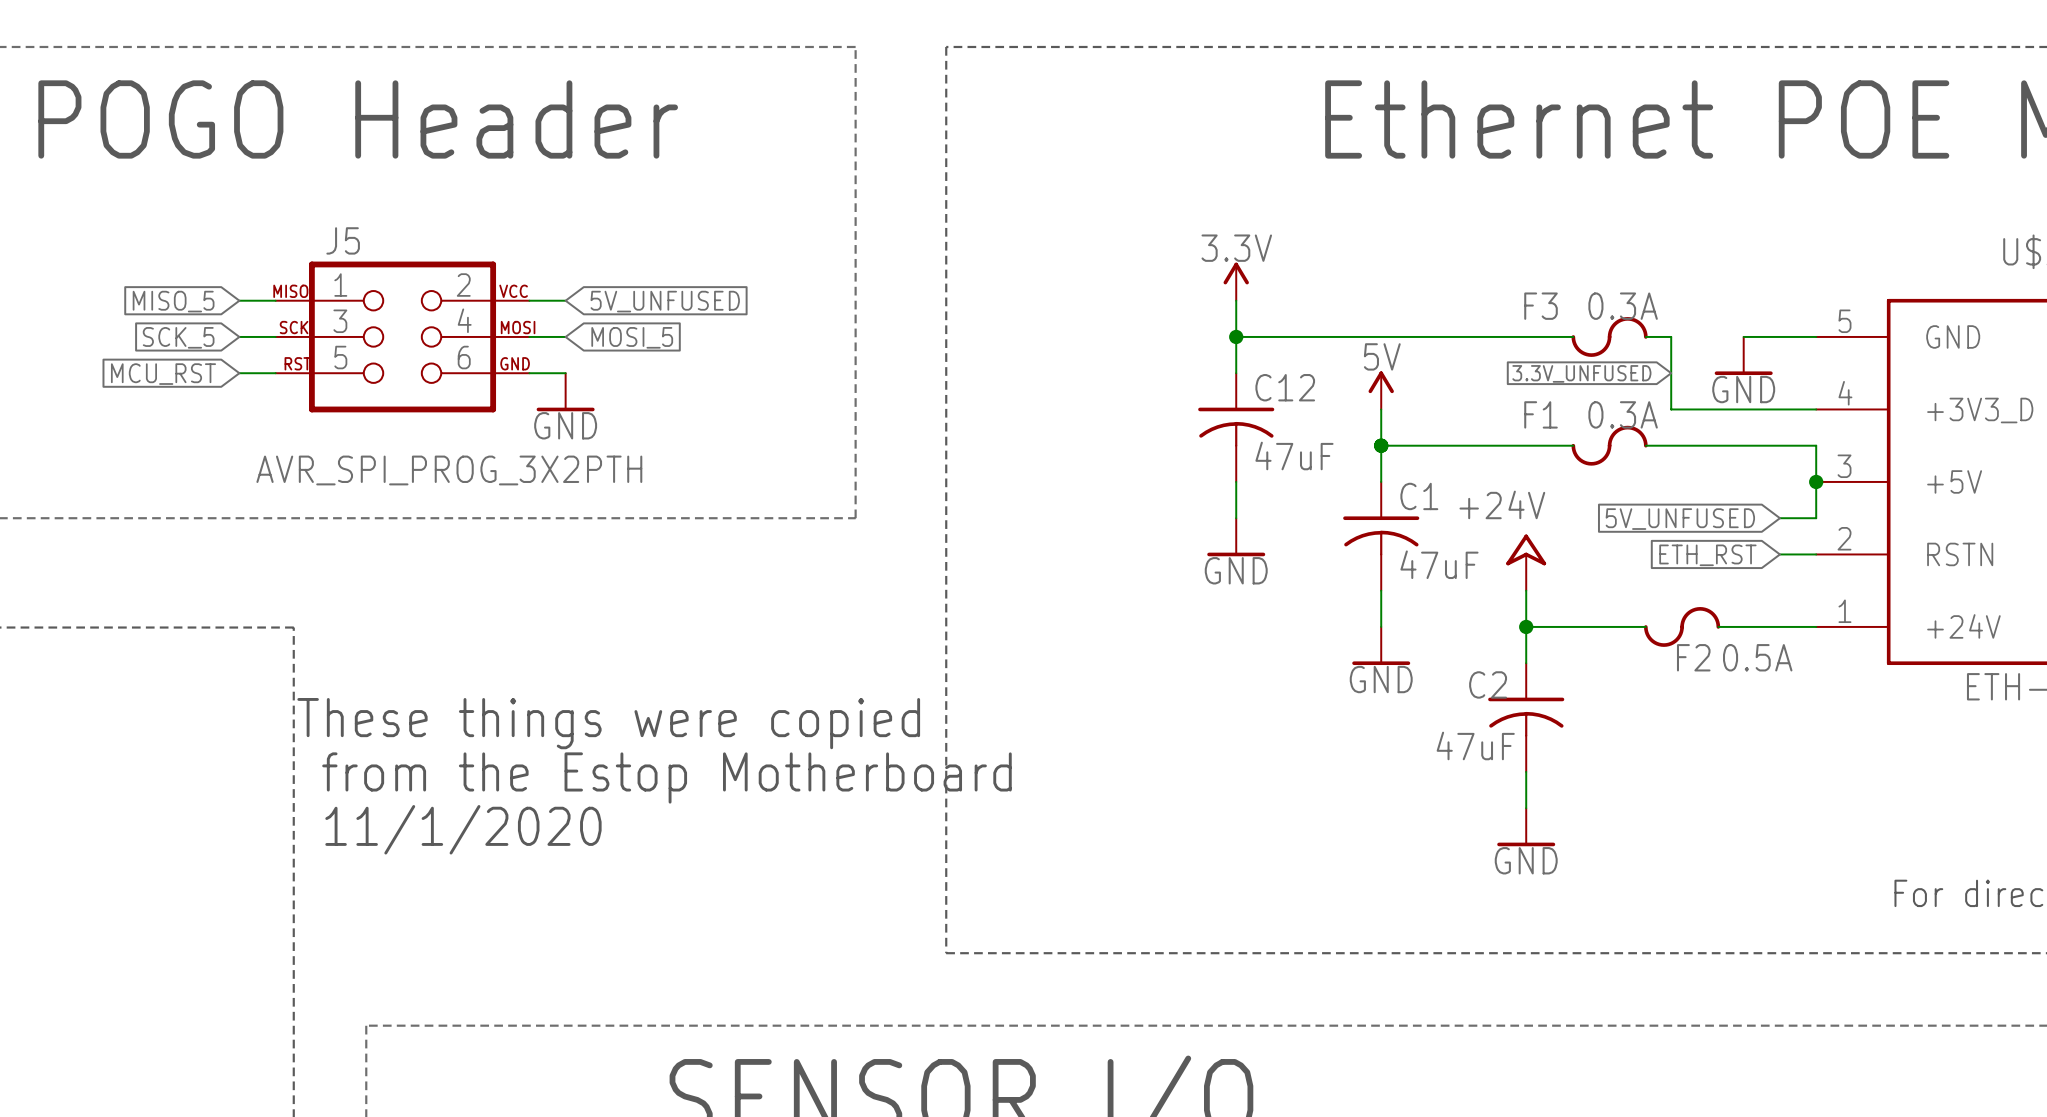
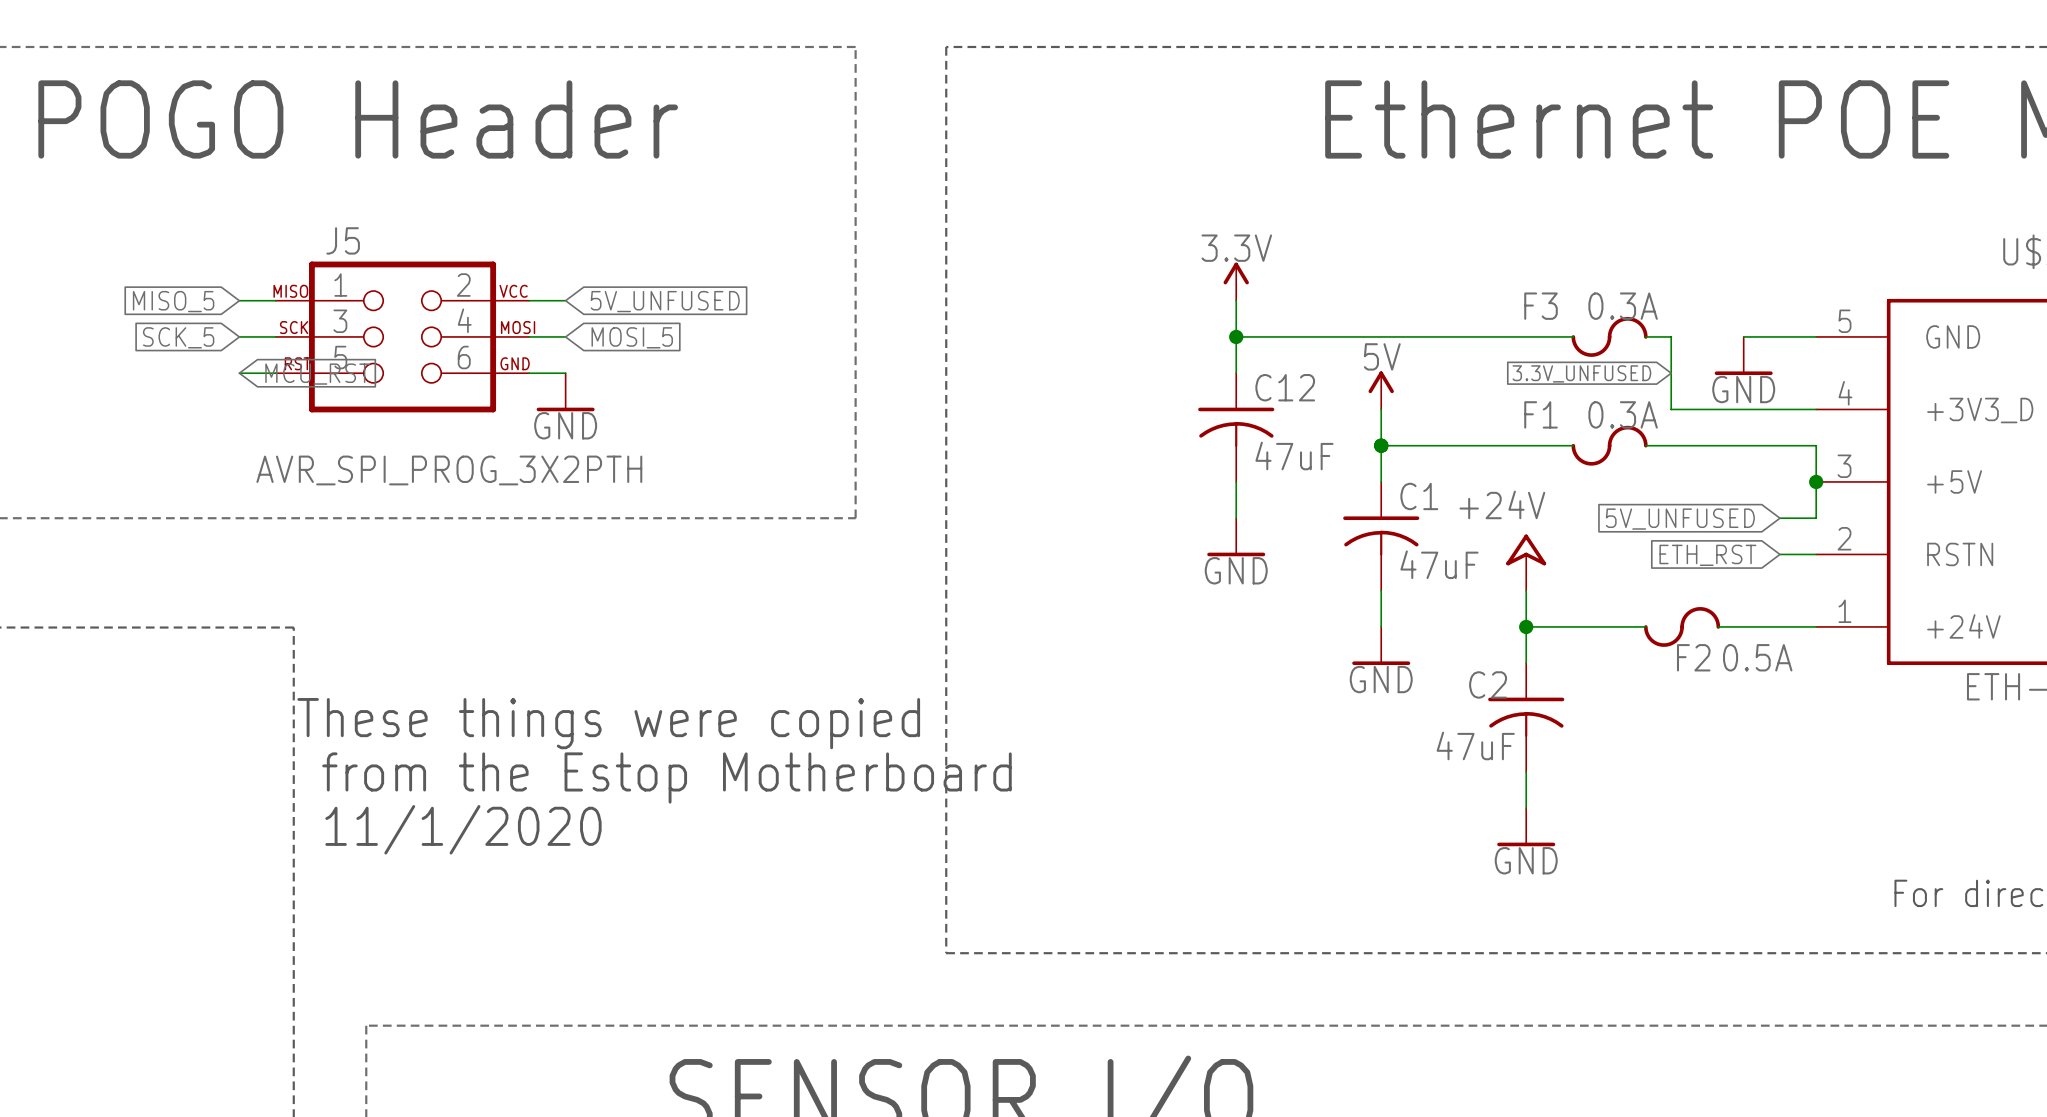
global label rotation: 0° (163, 374) -> 180° (317, 374)
global label position: MCU_RST (163, 374) -> MCU_RST (317, 374)

